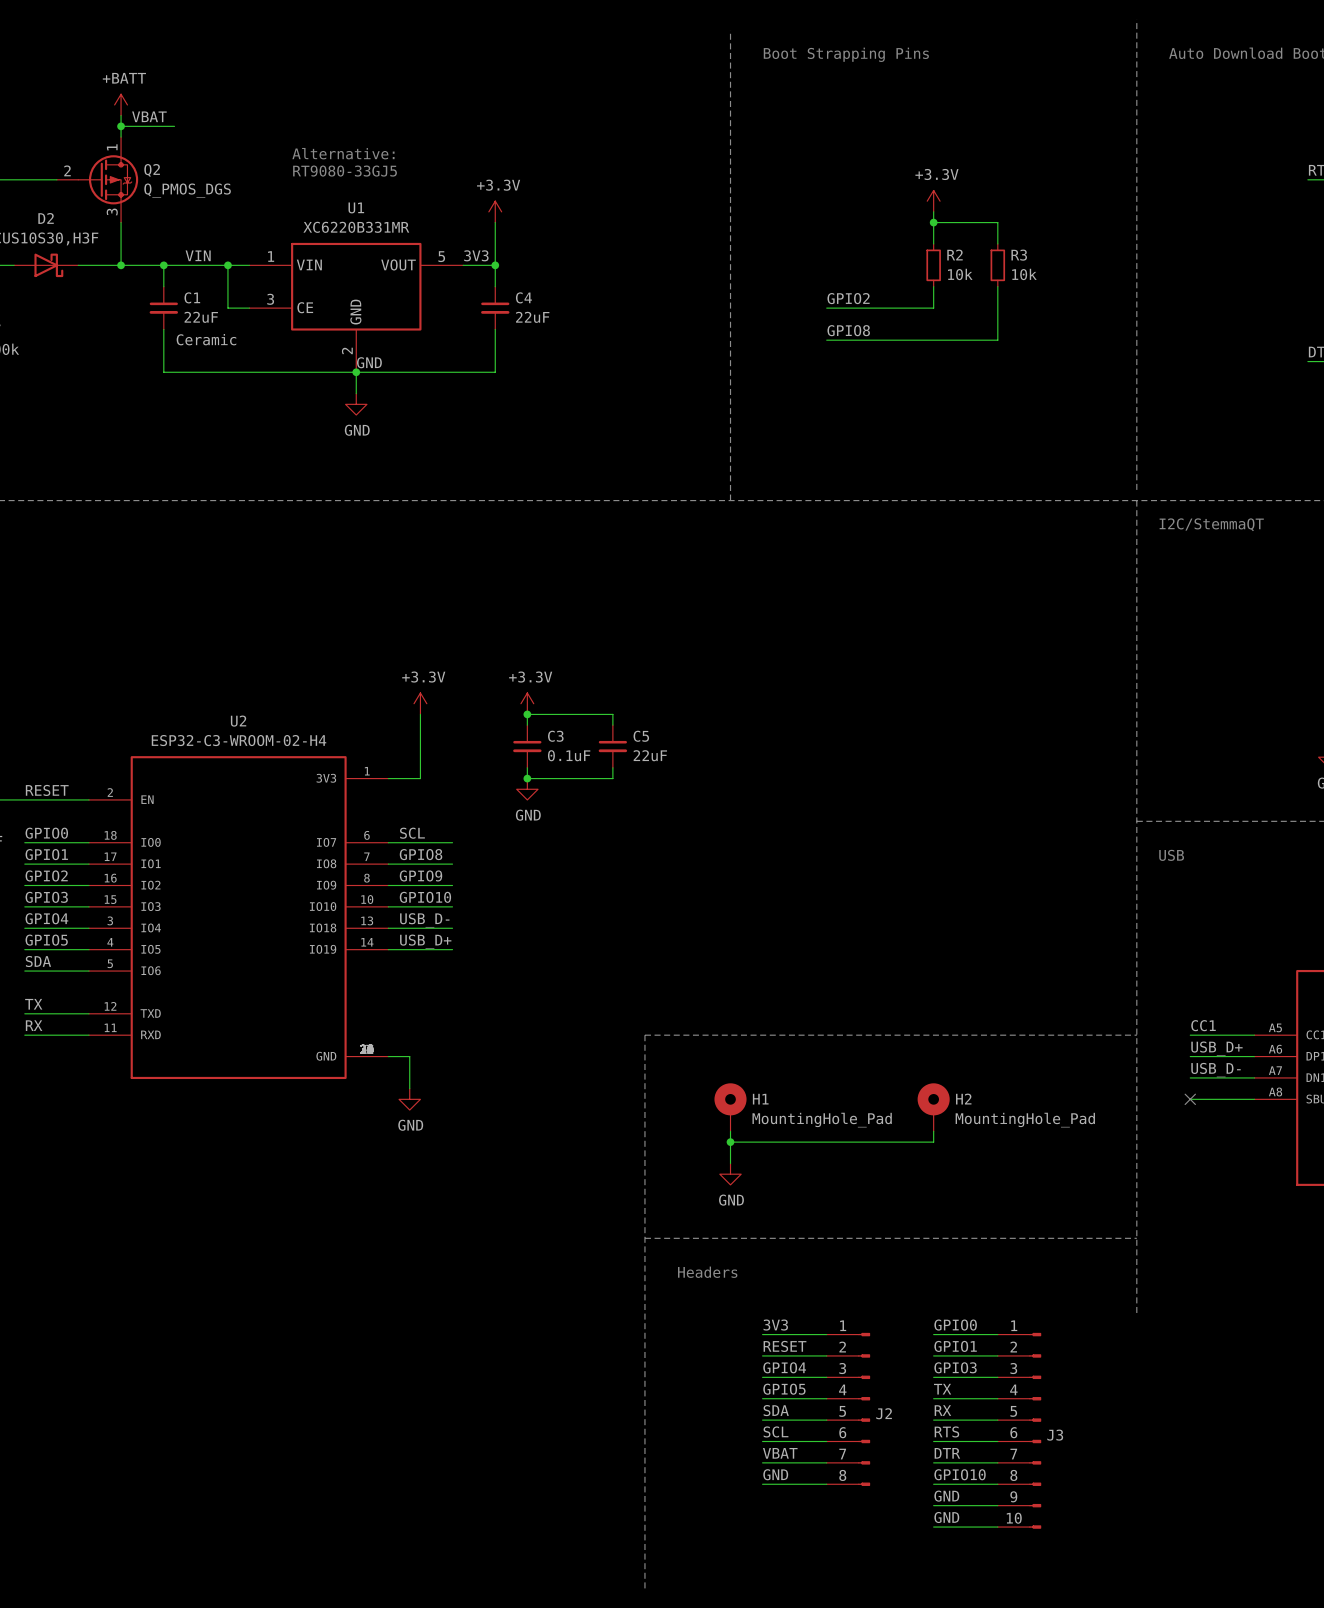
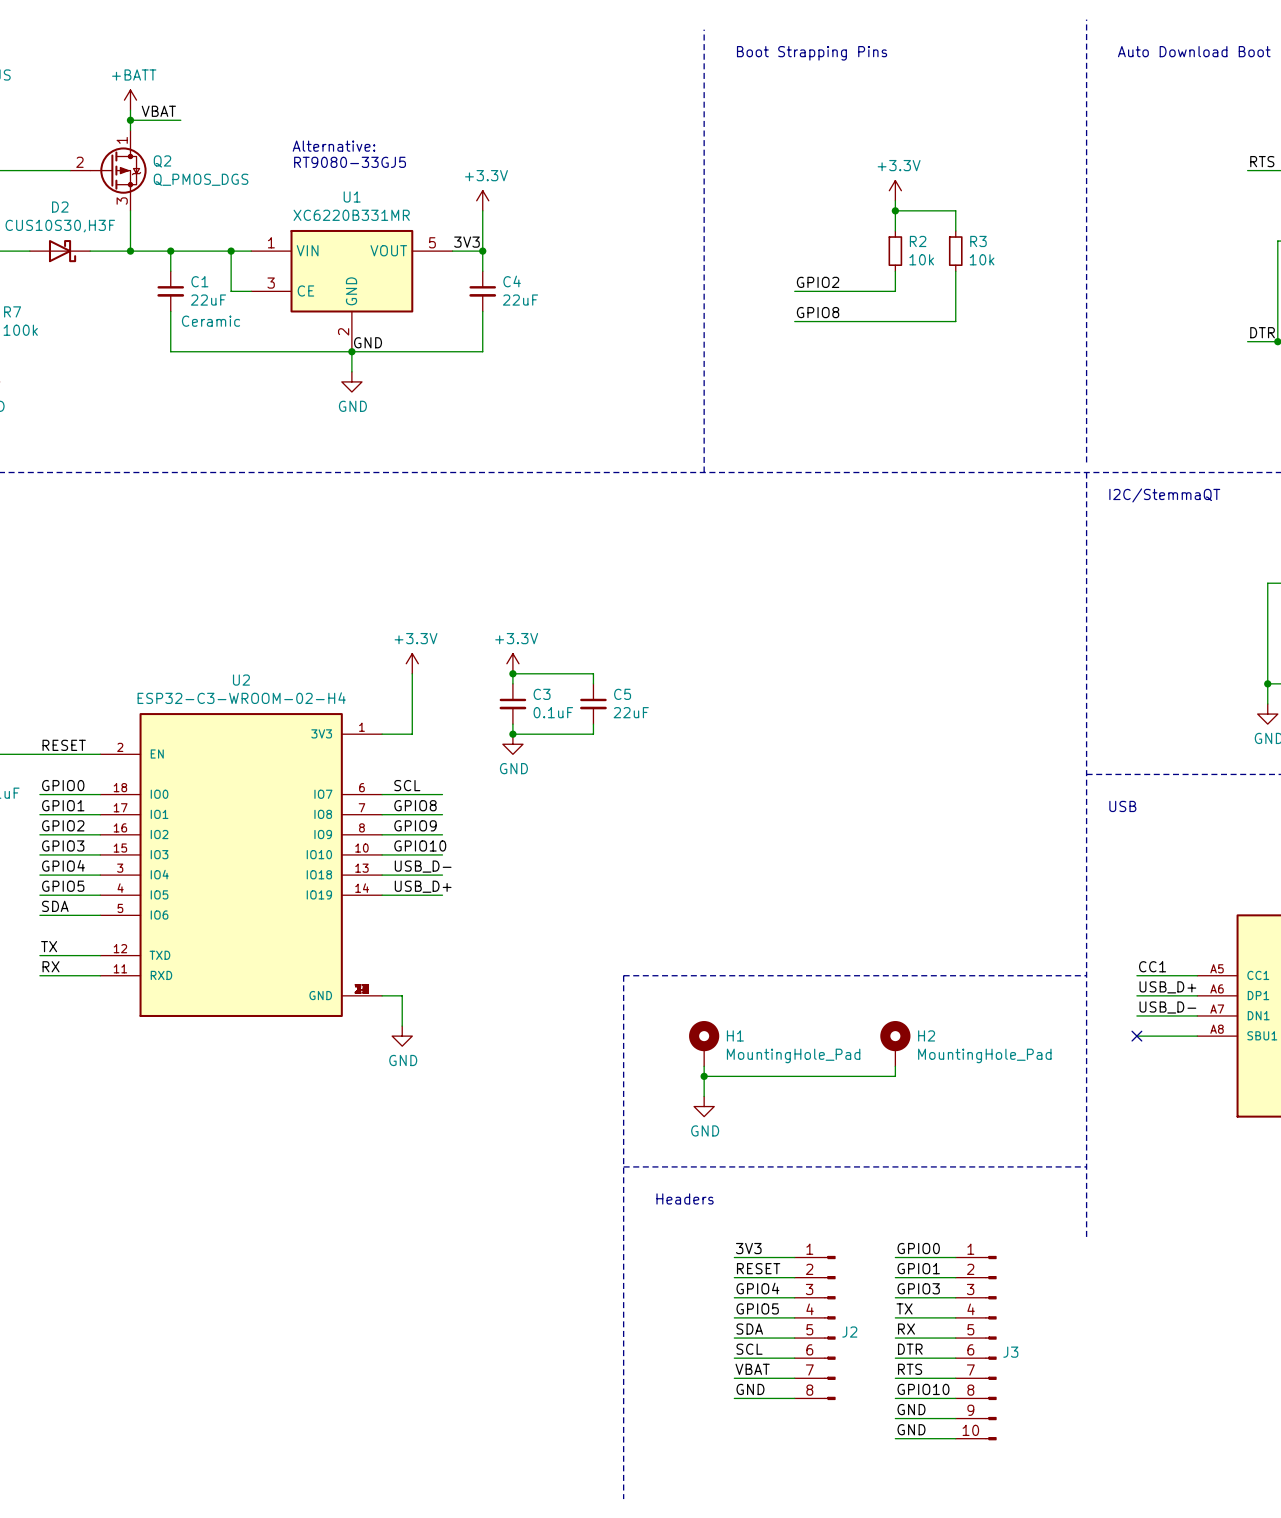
label: VIN (198, 255) -> none
label: RTS (946, 1431) -> DTR (910, 1349)
label: DTR (947, 1453) -> RTS (910, 1369)

